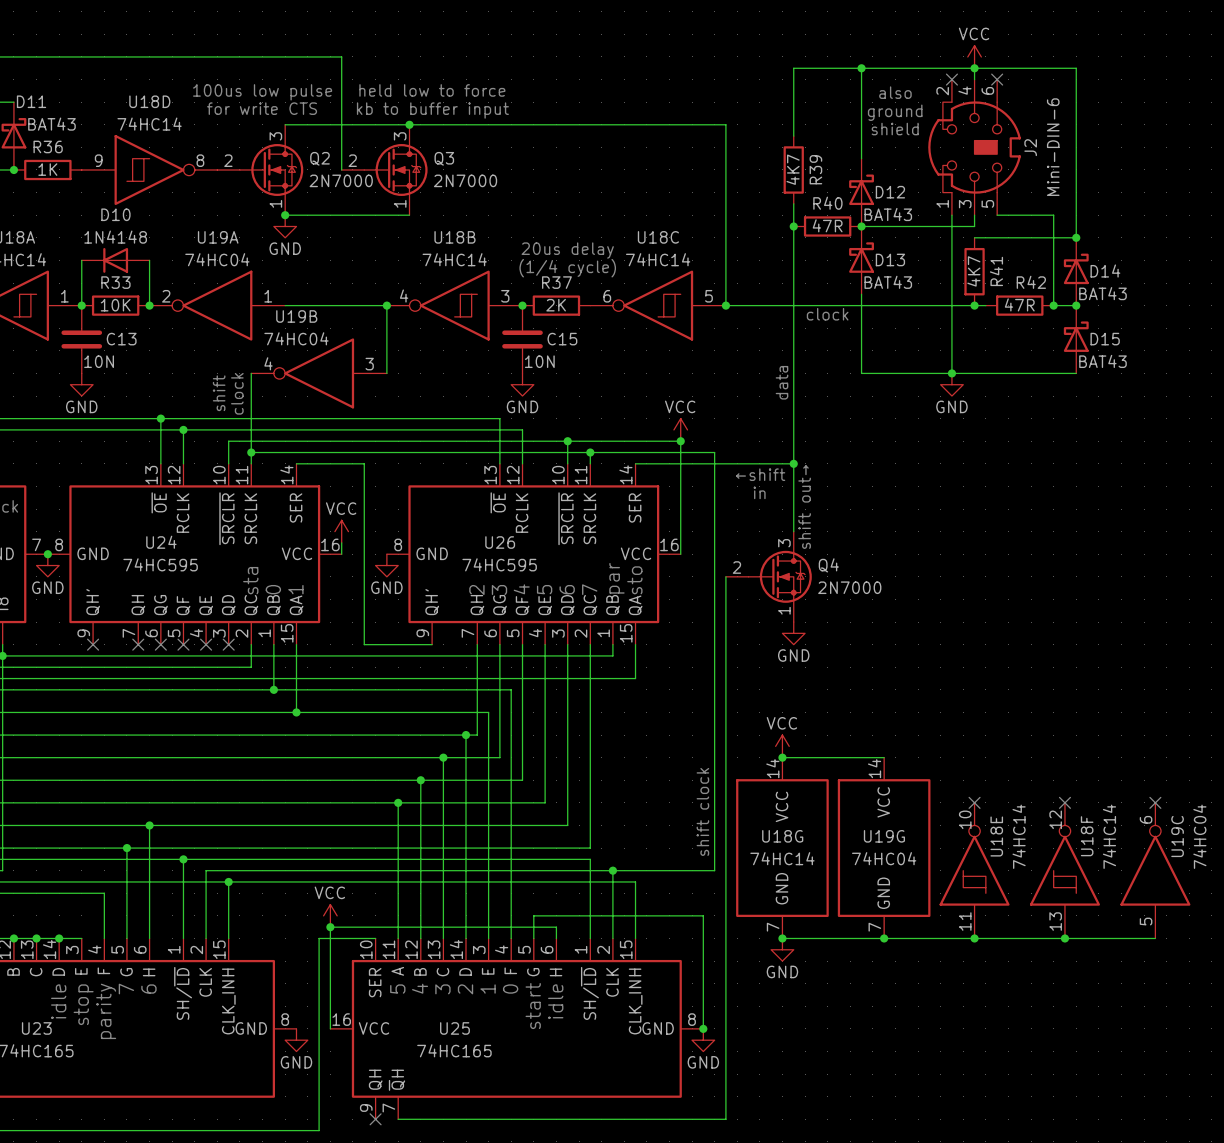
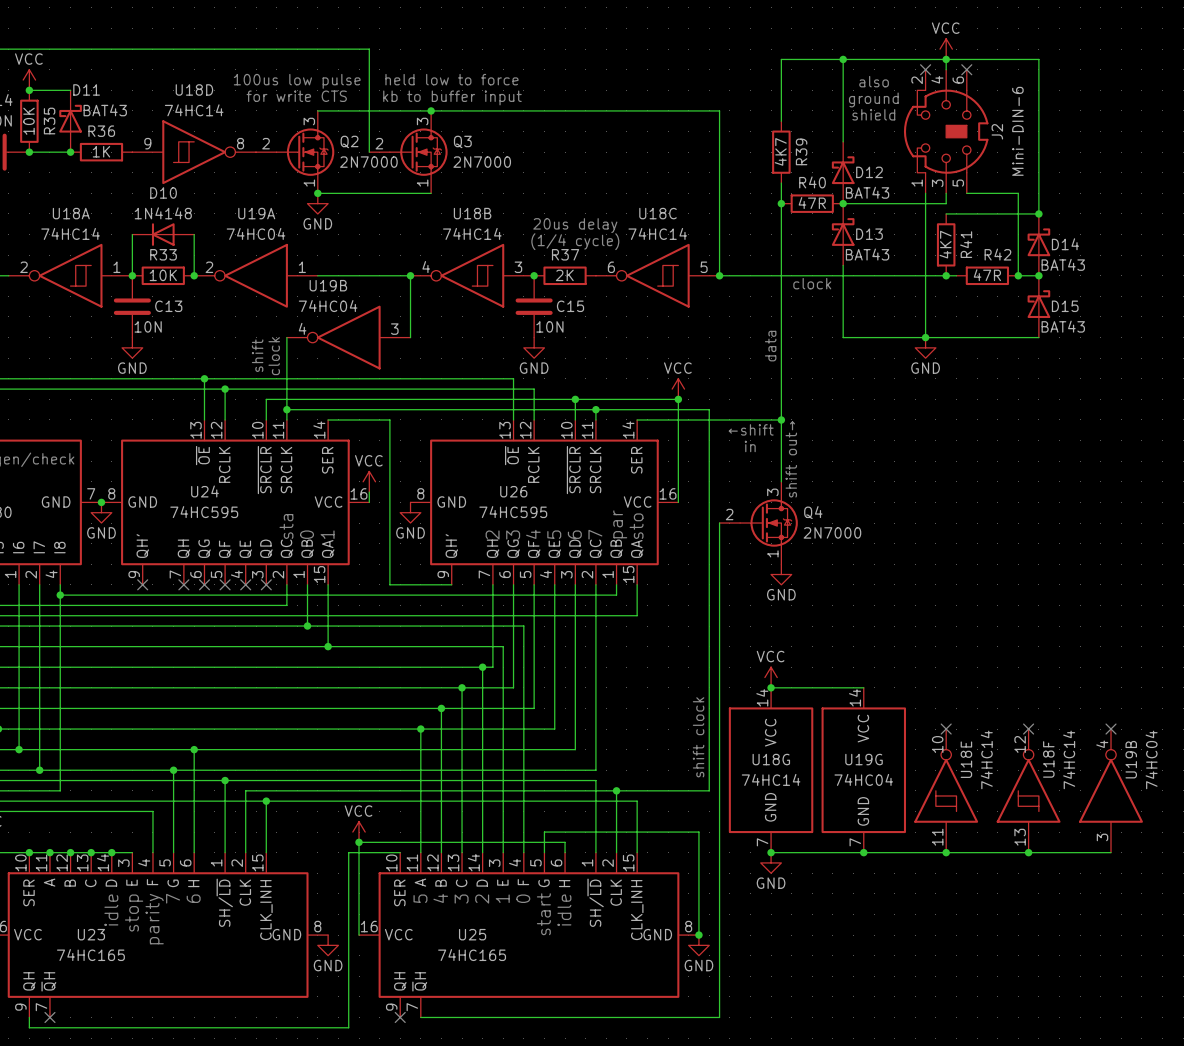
U19C pin number: 6 (1146, 819) -> 4 (1102, 744)
U19C name: U19C (1177, 836) -> U19B (1131, 759)
U19C pin number: 5 (1146, 921) -> 3 (1102, 837)

